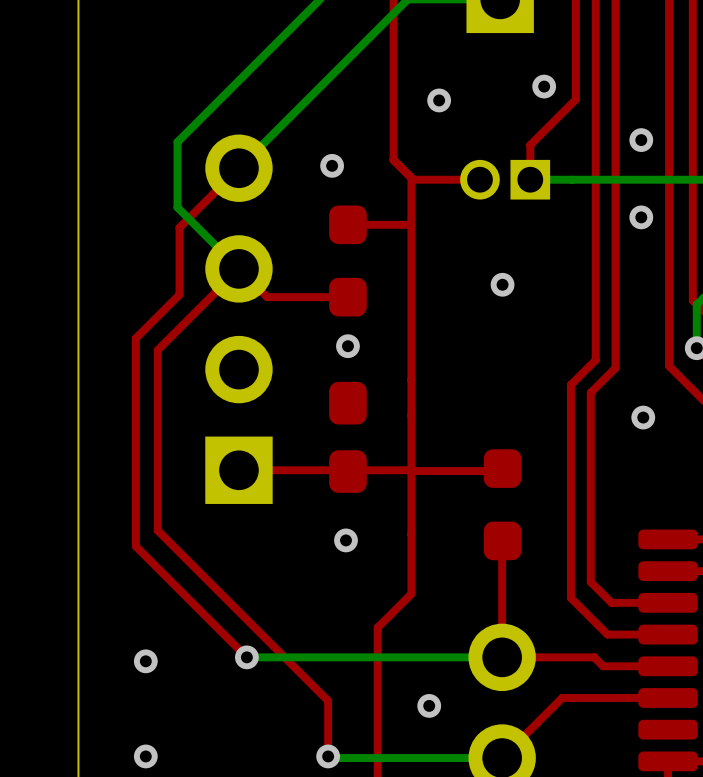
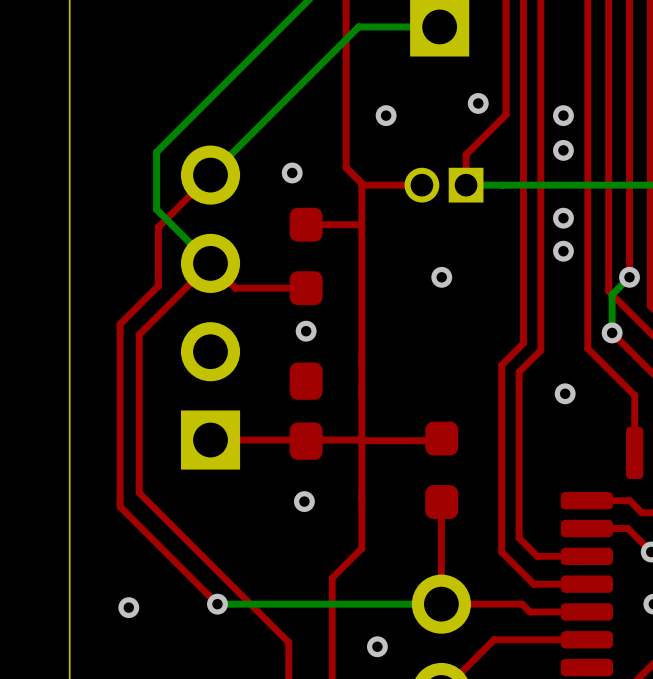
via: none -> (563, 115)
via: none -> (563, 251)

